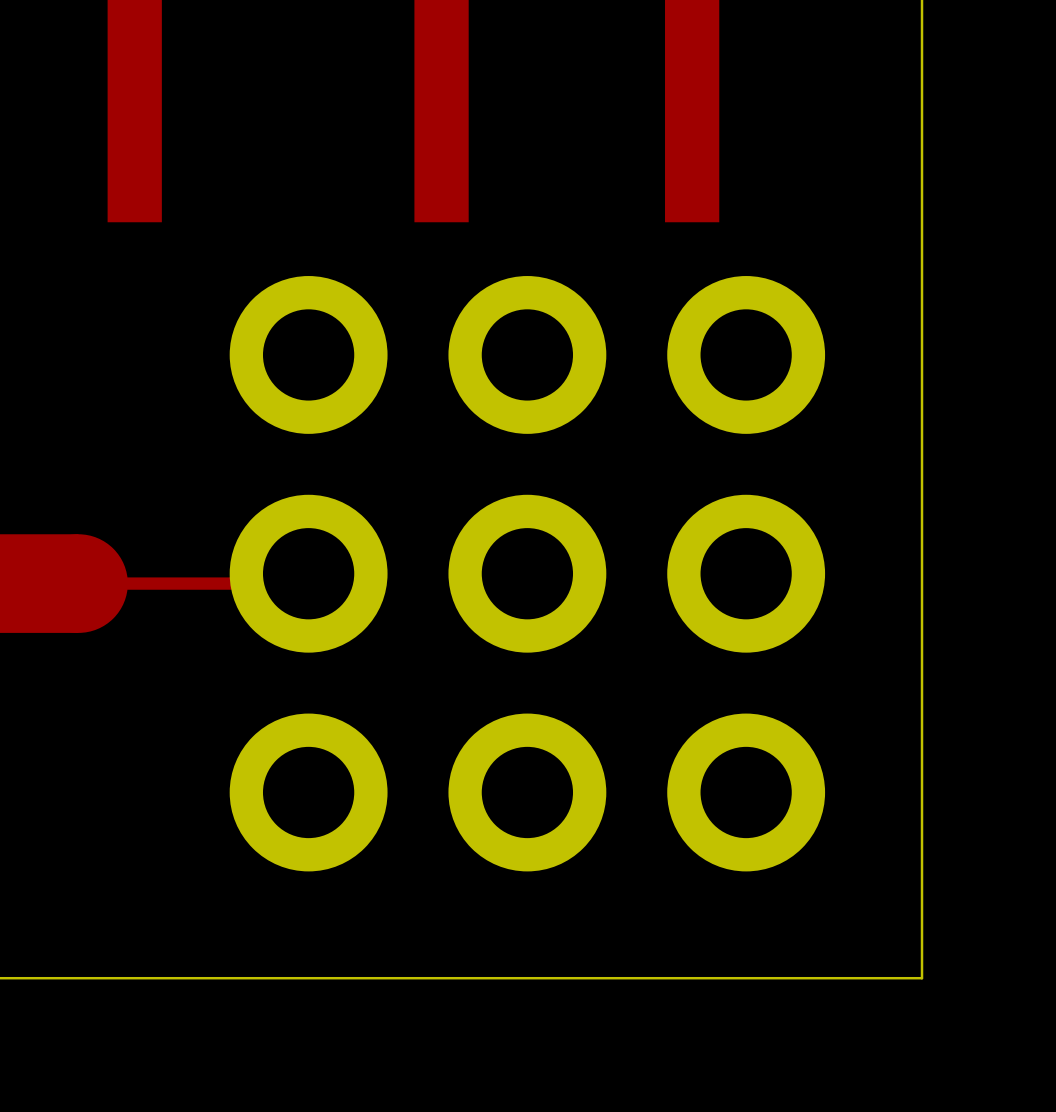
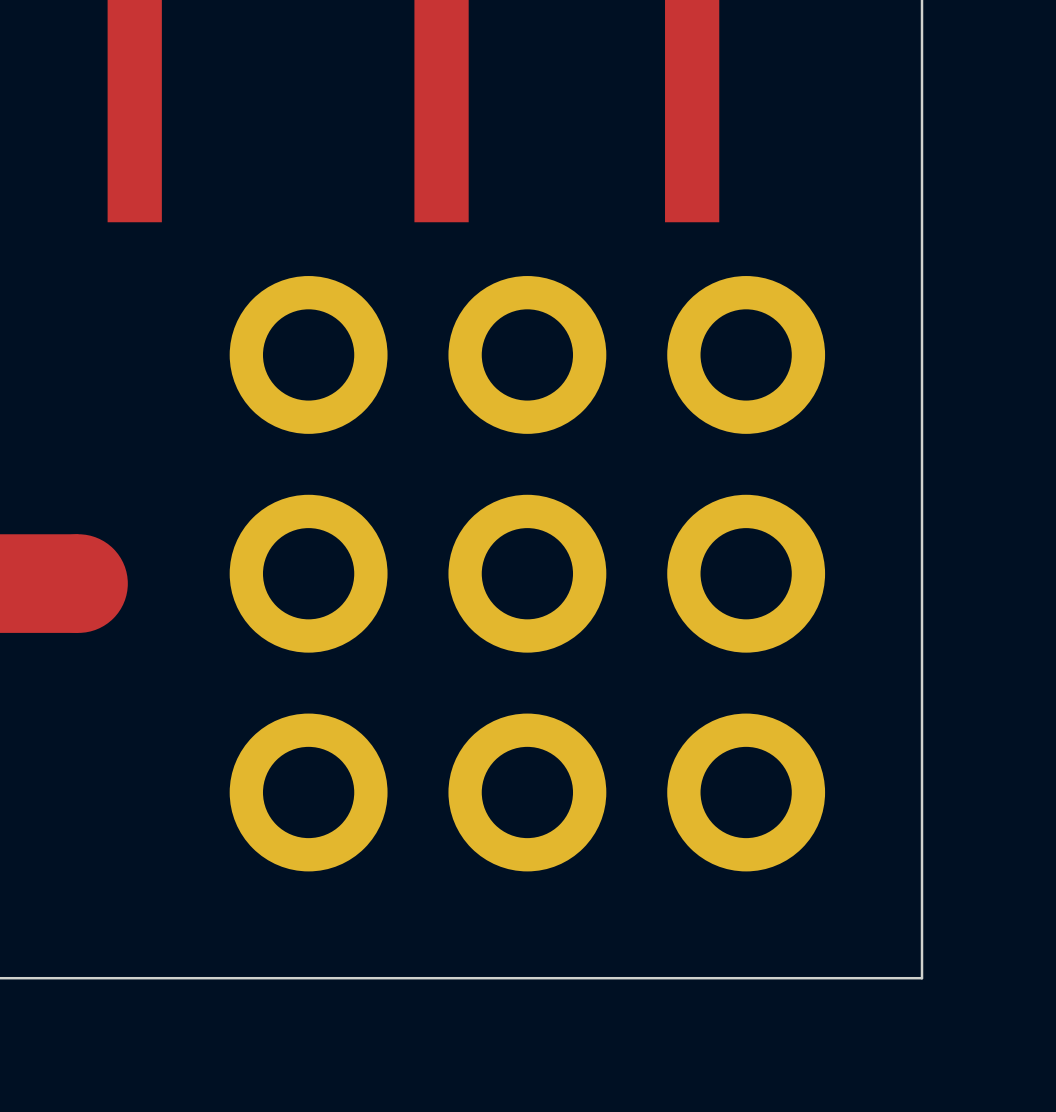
top track: (308, 573) (298, 583) (78, 583) -> none

